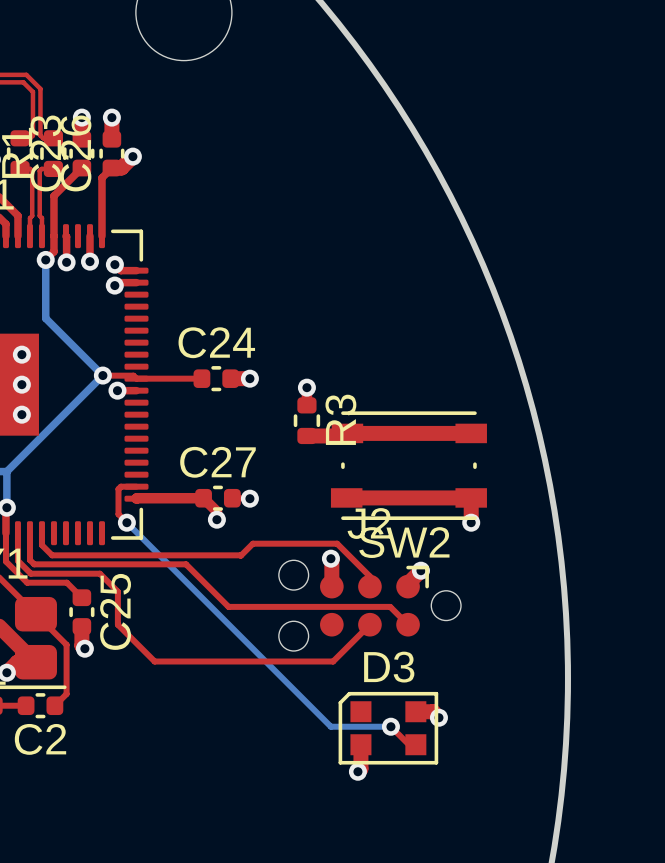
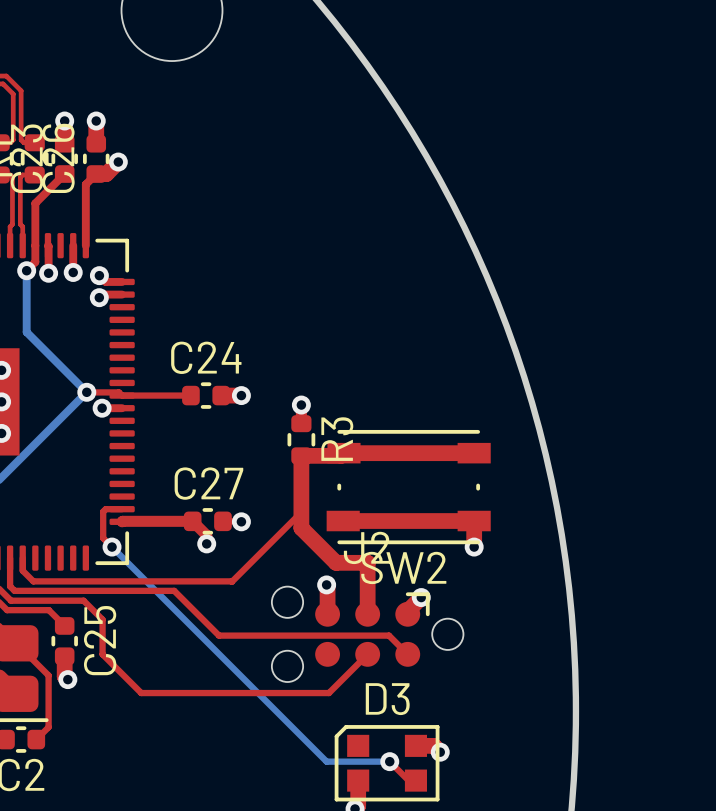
top track: (252, 543) (337, 543) (369, 576) -> (244, 569) (301, 512) (301, 455) (301, 528) (336, 562) (367, 562) (367, 603)

